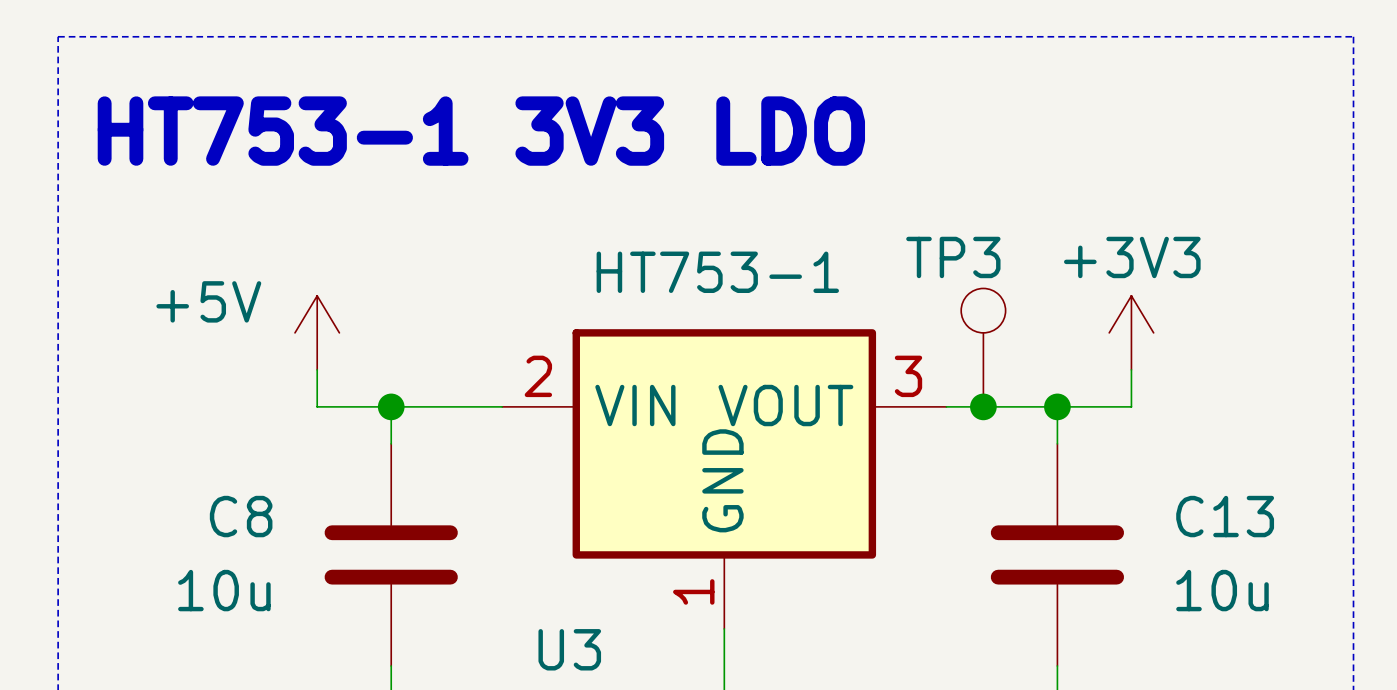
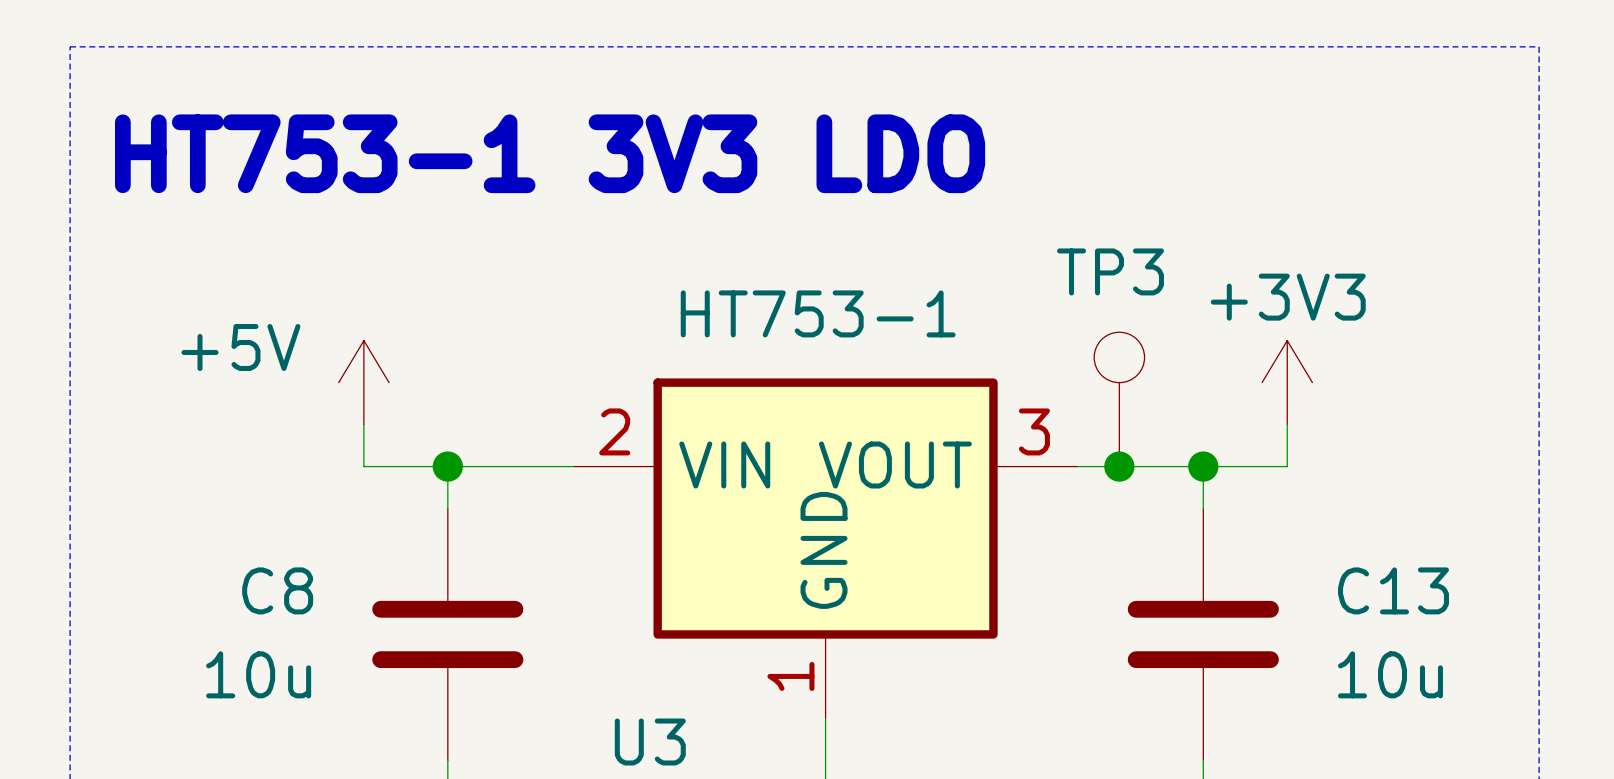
TP3 name position: TP3 (953, 257) -> TP3 (1110, 271)

